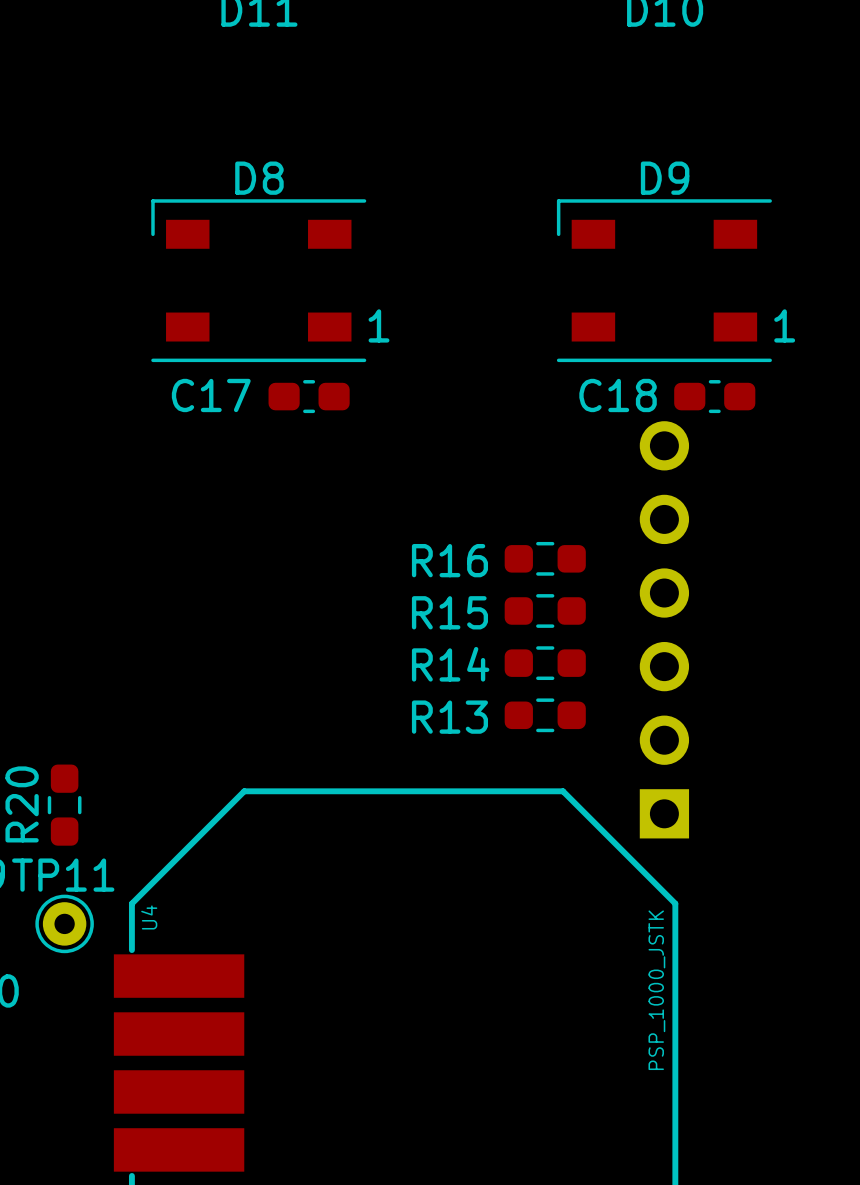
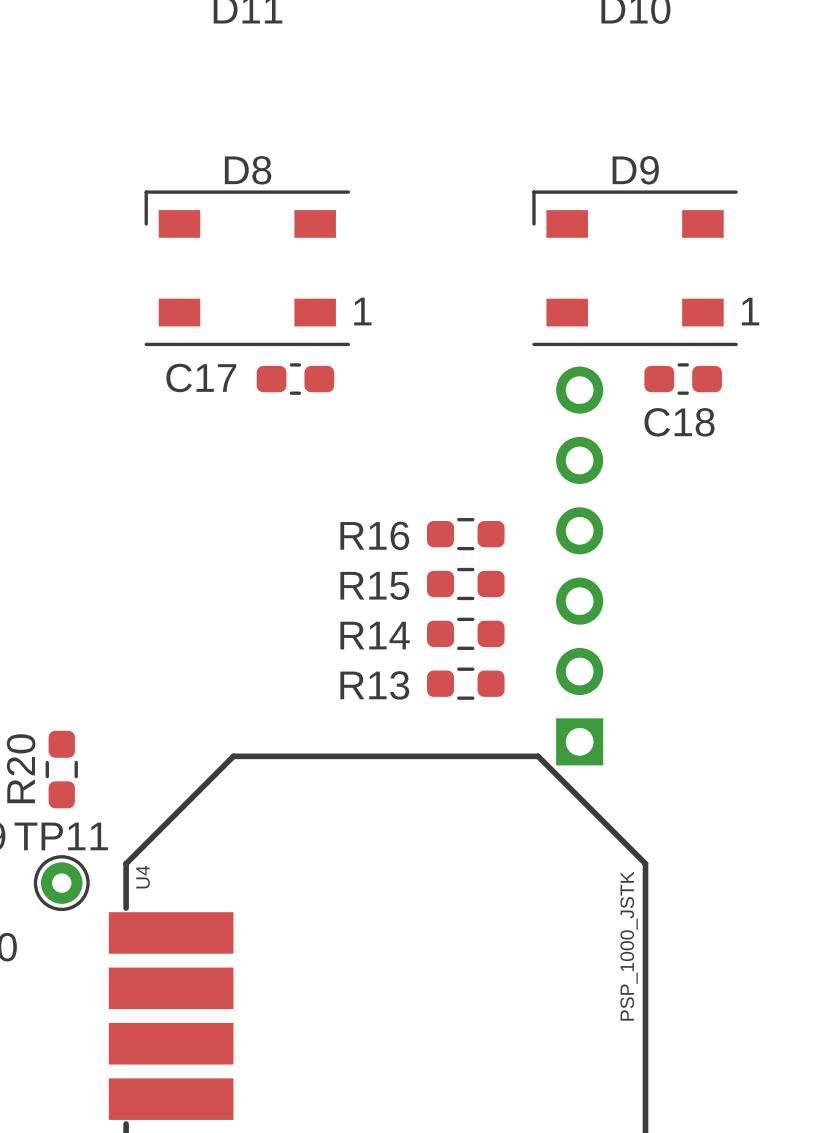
C18 name position: C18 (618, 395) -> C18 (679, 422)
R16 position: (545, 558) -> (465, 534)
R15 position: (545, 610) -> (465, 583)
part position: (664, 629) -> (579, 565)
R14 position: (545, 663) -> (465, 633)
R13 position: (545, 715) -> (465, 683)

